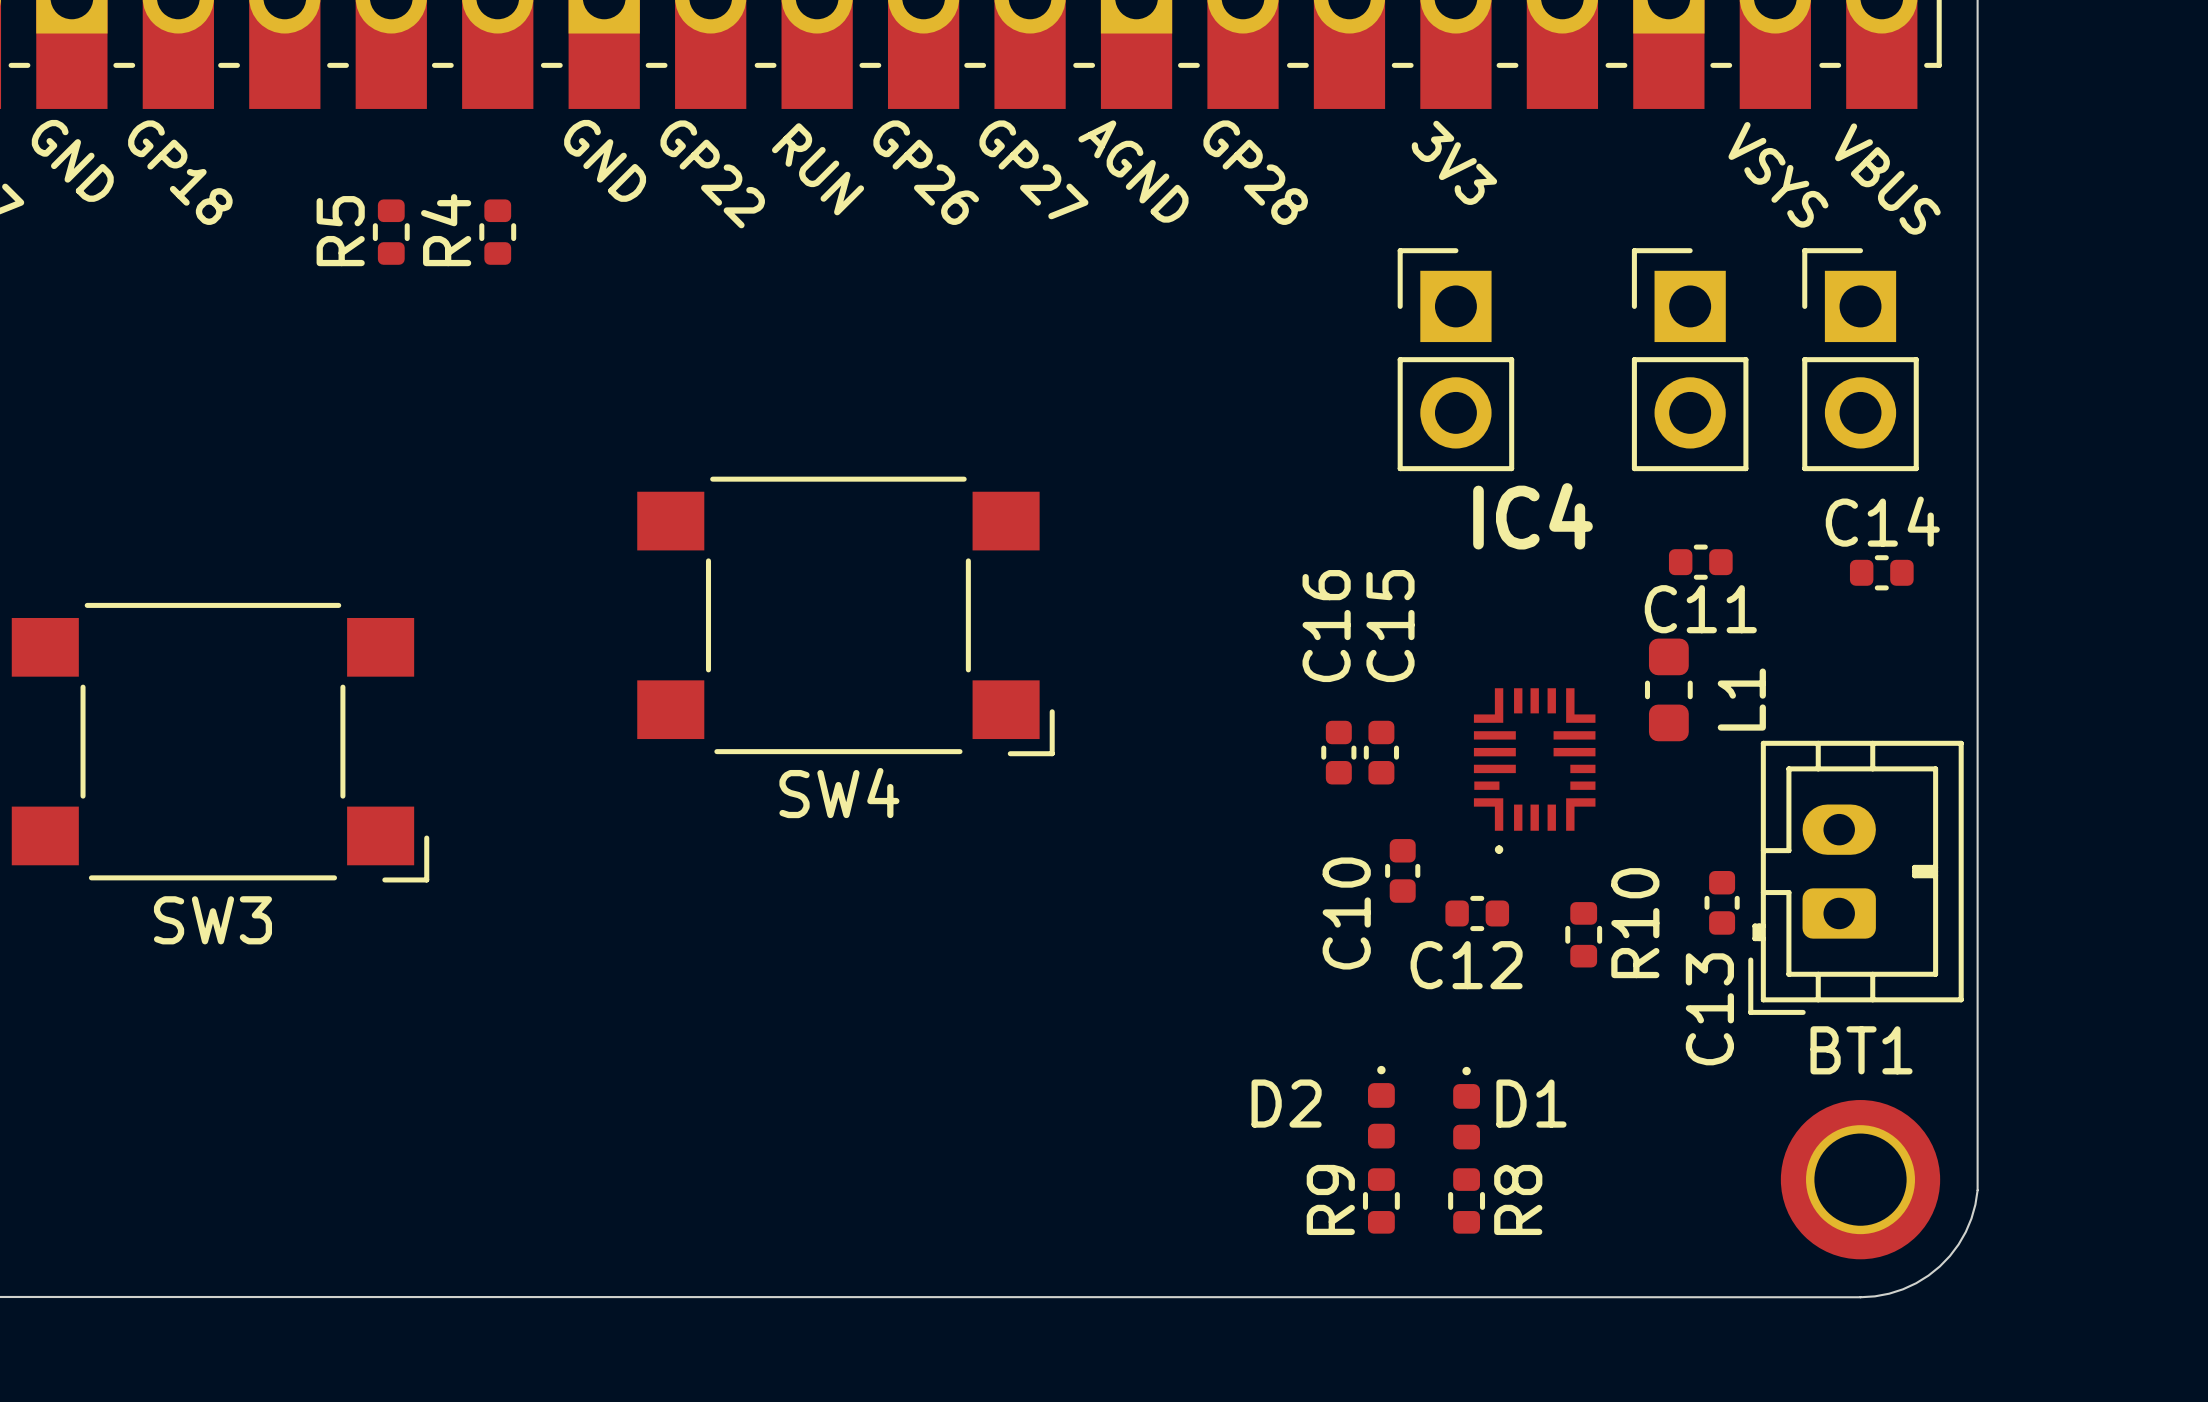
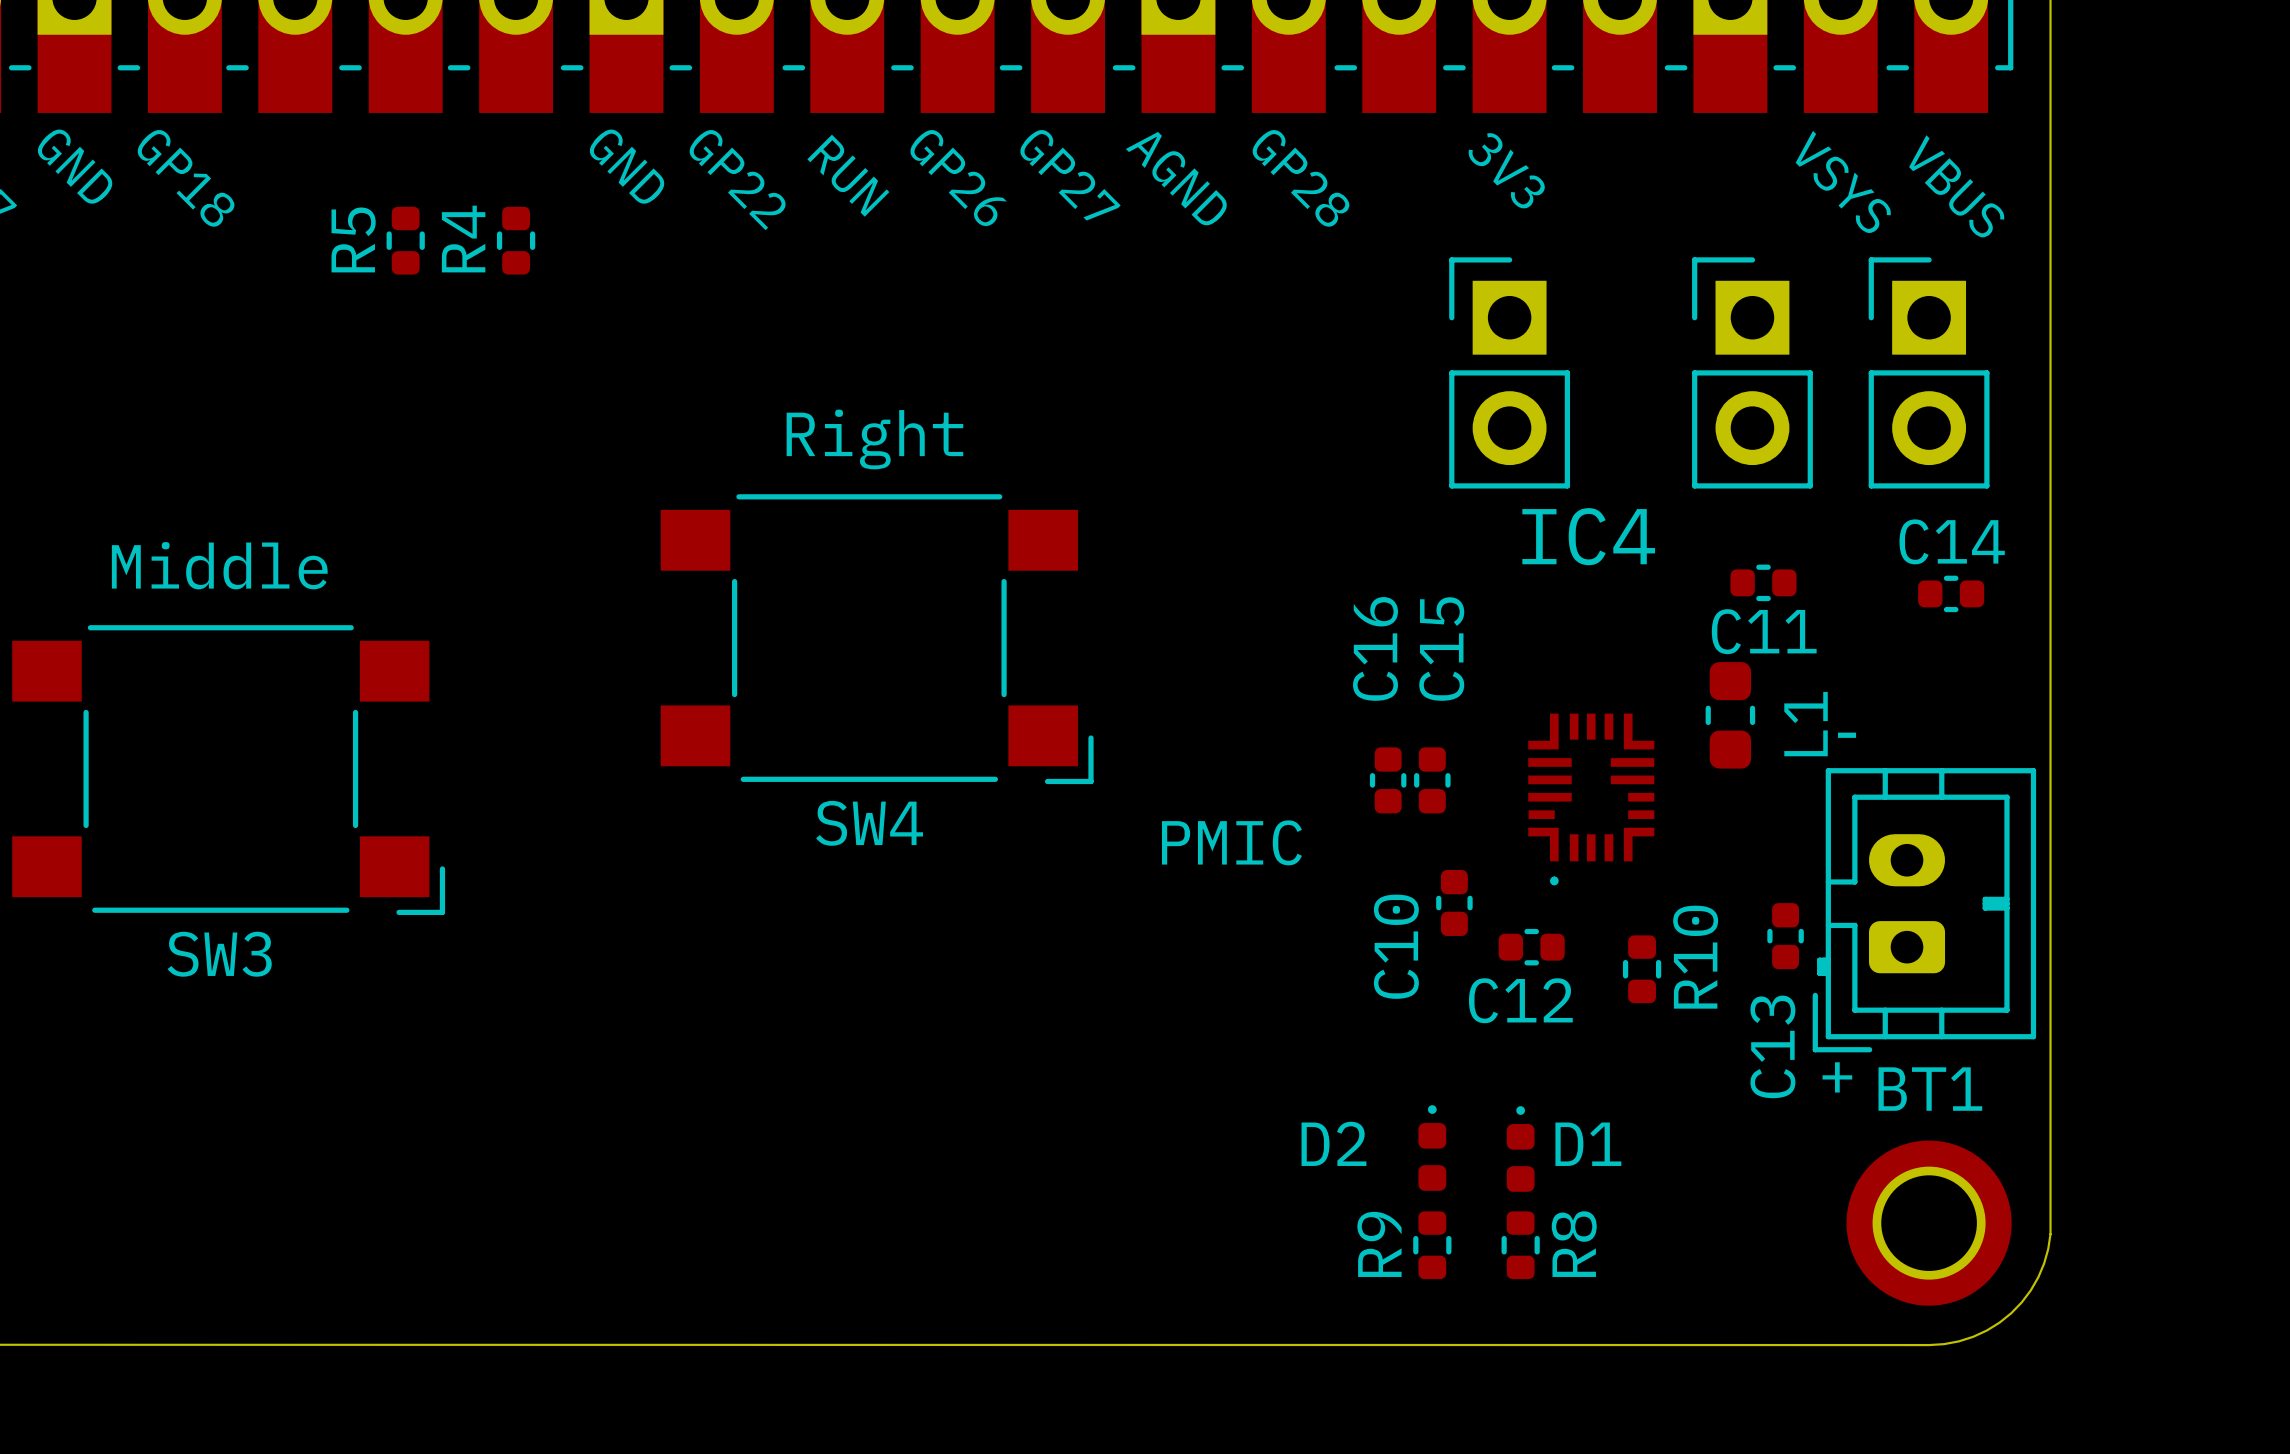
text: none -> Right (874, 439)
text: none -> Middle (219, 565)
text: none -> - (1847, 735)
text: none -> PMIC (1231, 842)
text: none -> + (1837, 1077)

